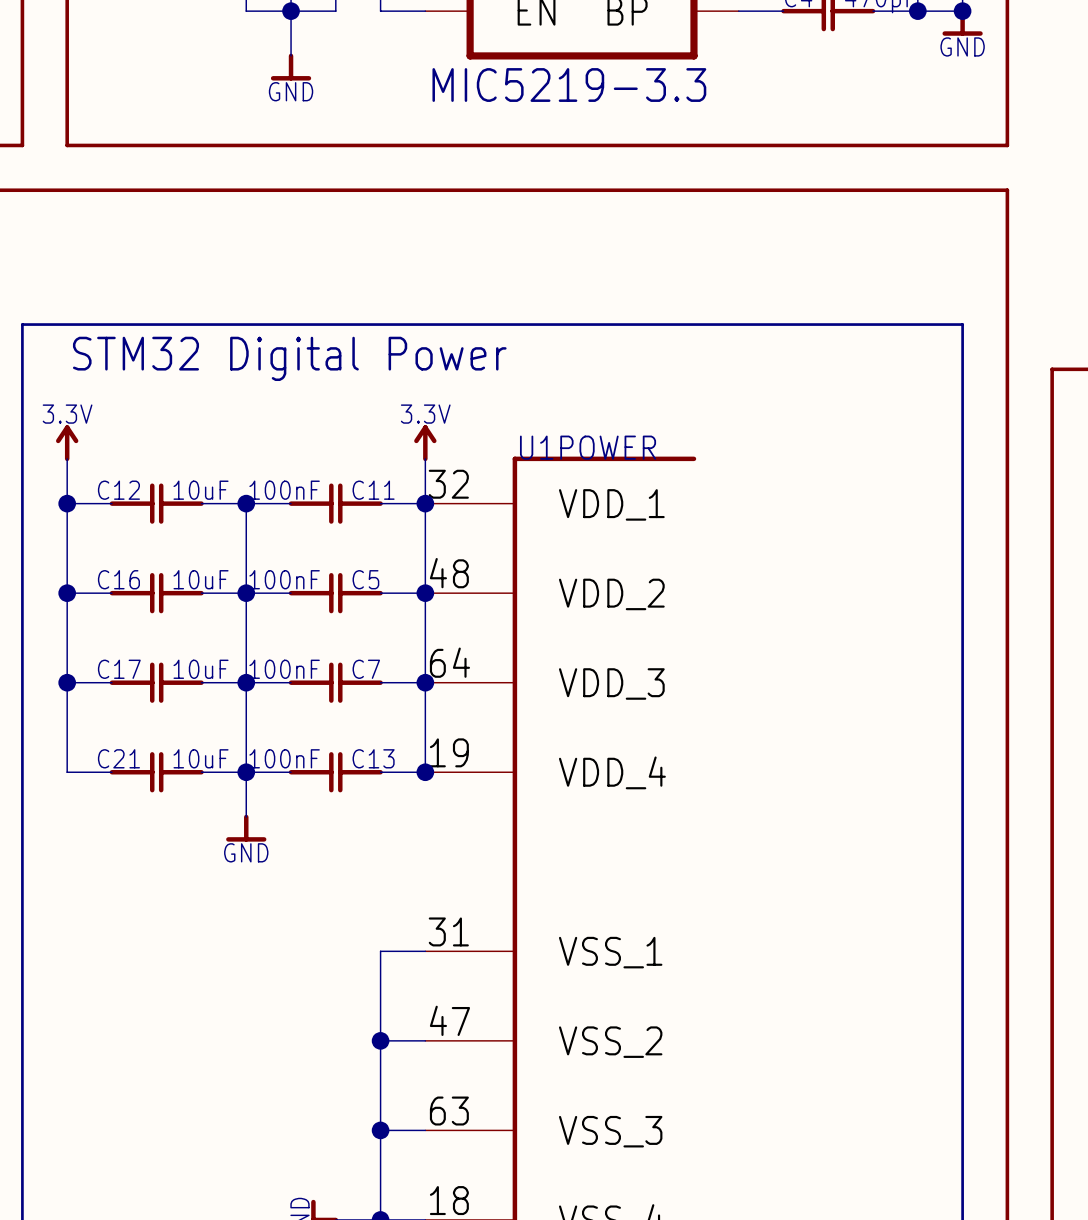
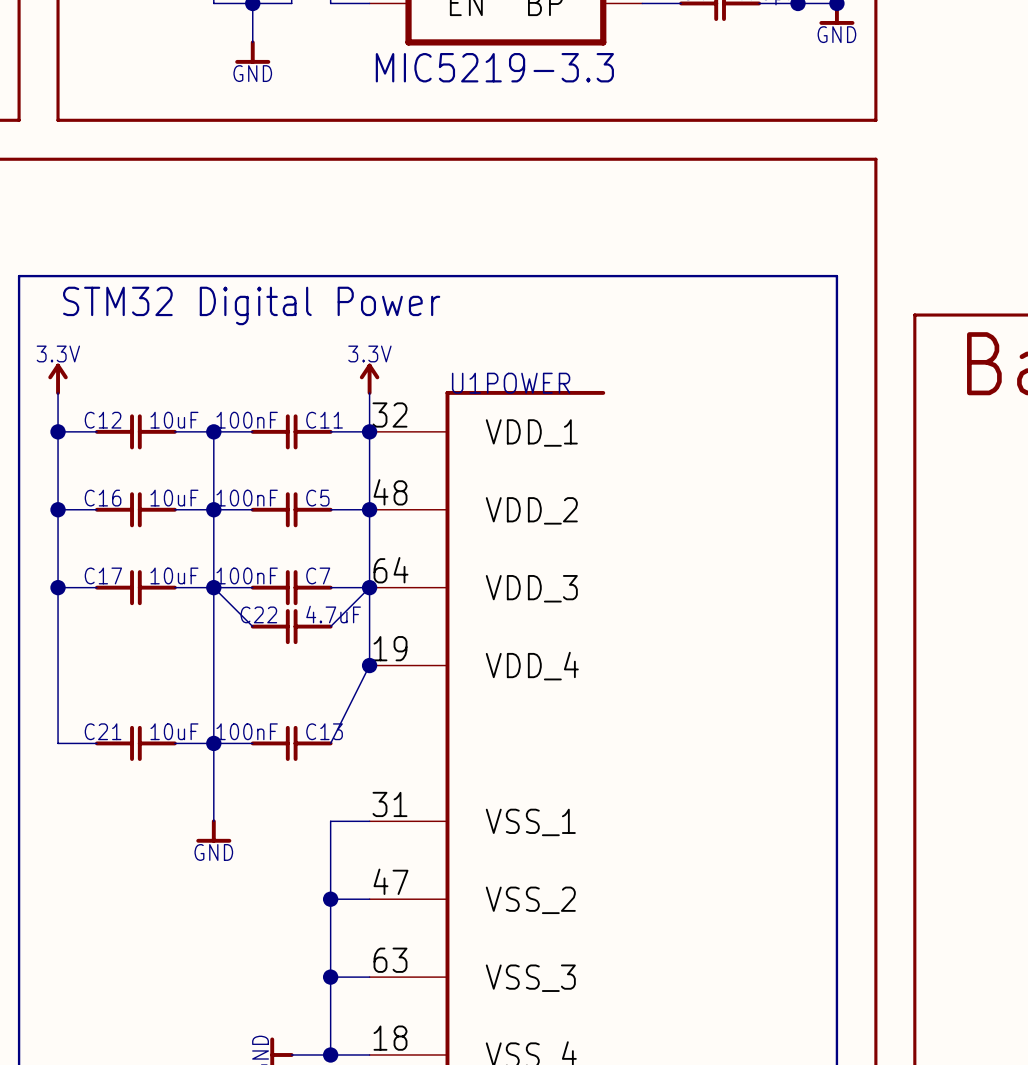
wire: none -> (213, 587) (252, 626)
wire: none -> (369, 587) (330, 626)
C22: none -> 4.7uF (291, 626)
wire: (67, 772) (111, 772) -> (58, 665) (58, 743) (96, 743)
C21 position: (156, 772) -> (135, 743)
wire: (201, 772) (291, 772) -> (174, 743) (252, 743)
junction position: (246, 772) -> (213, 743)
C13 position: (335, 772) -> (291, 743)
wire: (380, 772) (425, 772) -> (330, 743) (369, 665)
wire: none -> (213, 704) (213, 821)
power symbol position: GND (246, 828) -> GND (213, 831)

